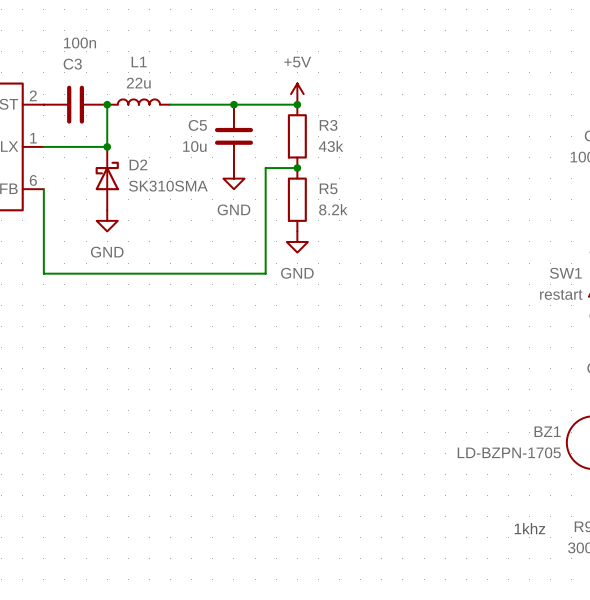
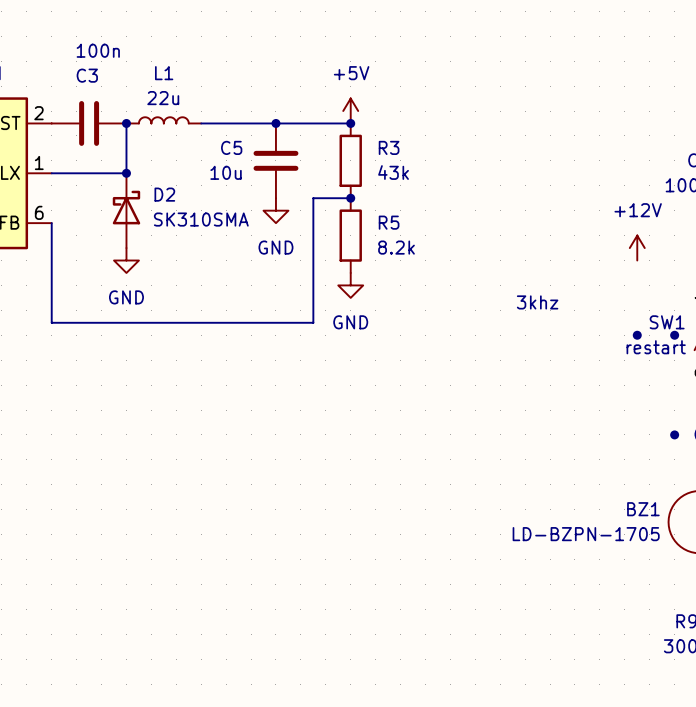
power symbol: none -> +12V (637, 248)
text: none -> 3khz (537, 302)
junction: none -> (637, 335)
junction: none -> (674, 335)
junction: none -> (674, 434)
text: 1khz (529, 528) -> none

